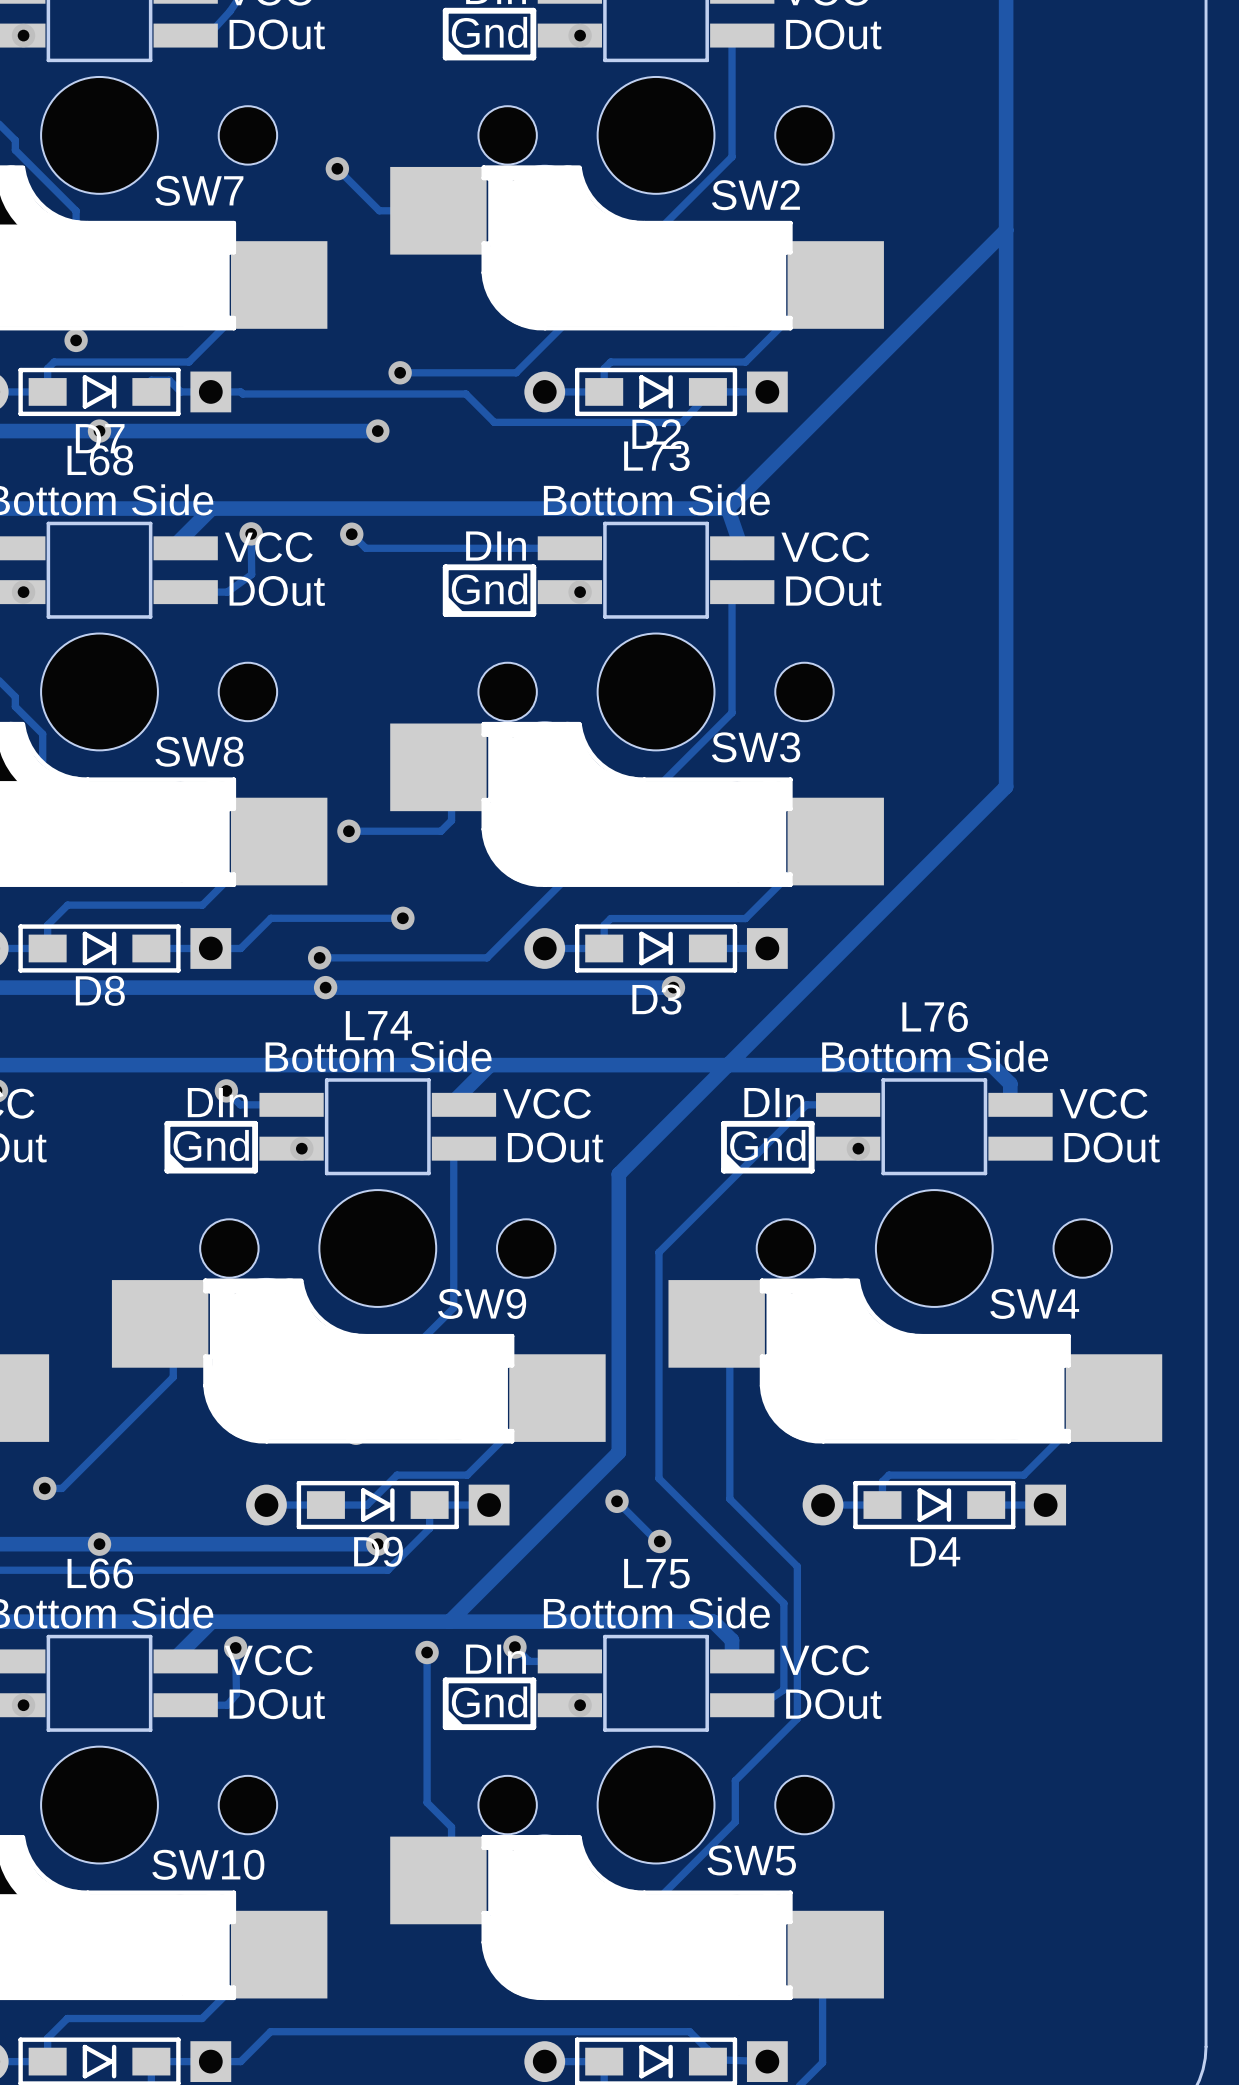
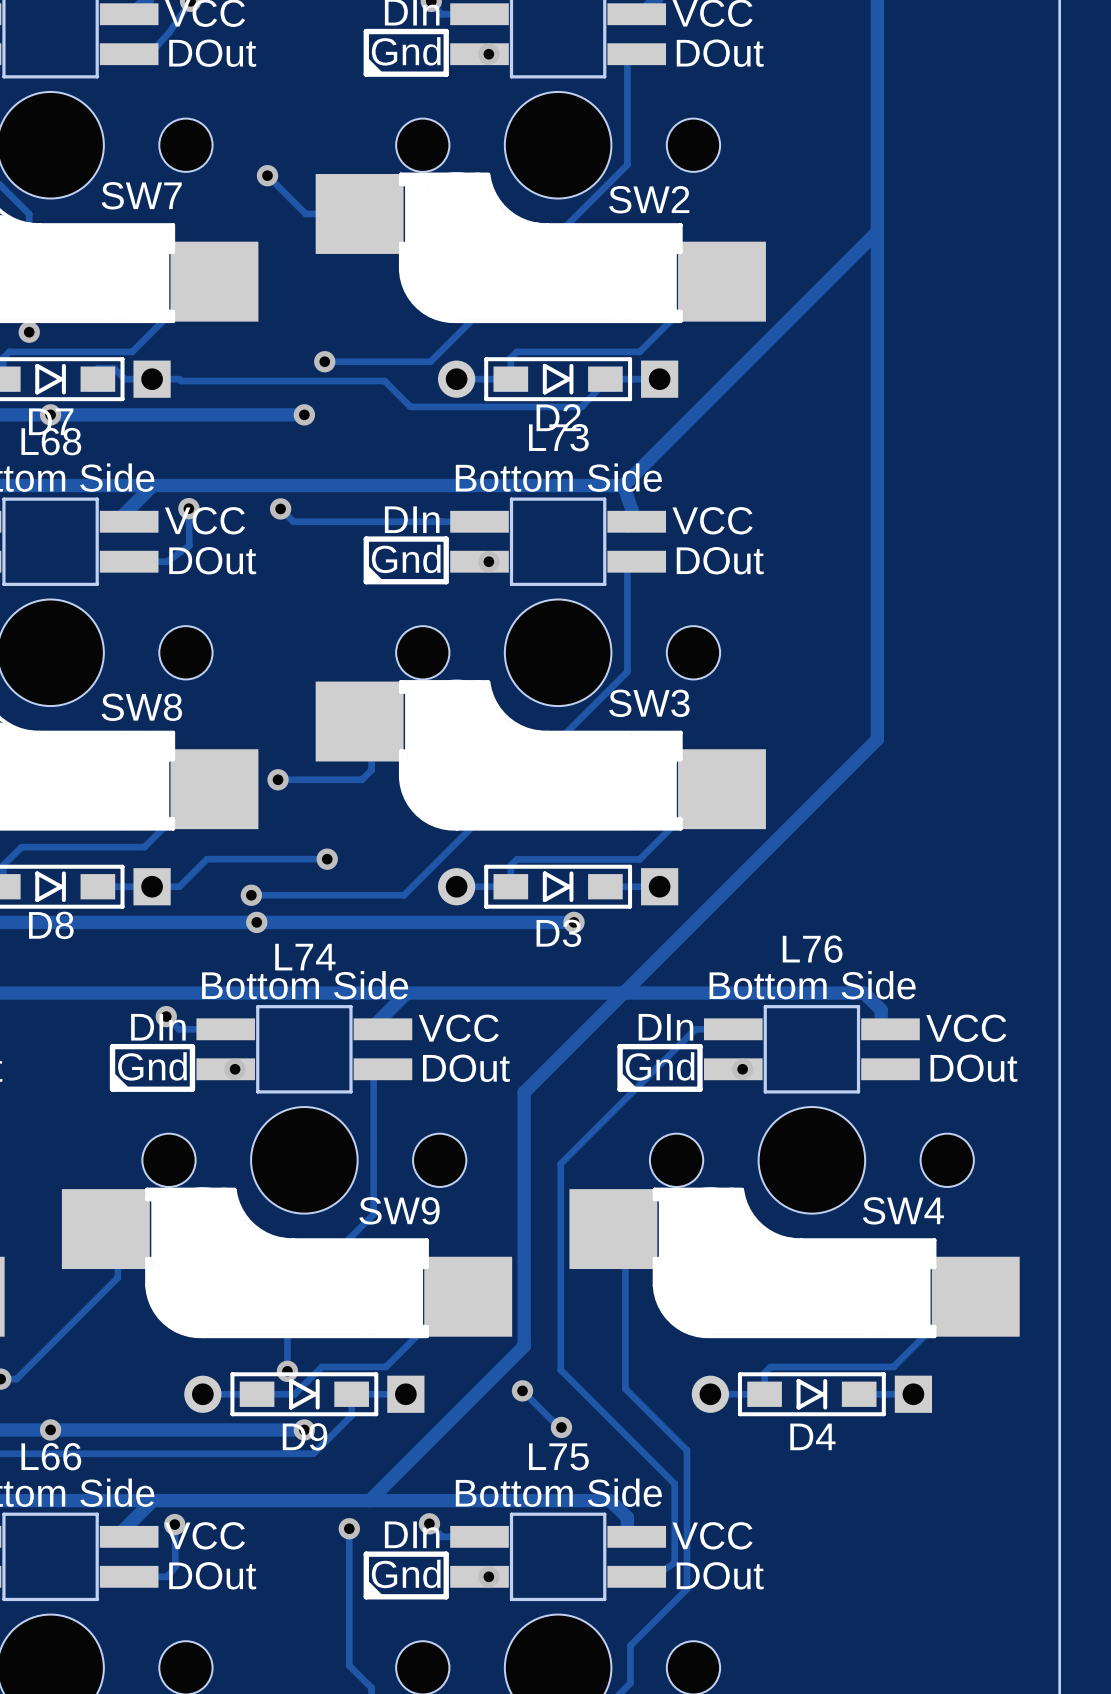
track: (359, 1402) (356, 1433) -> (287, 1300) (287, 1371)
via position: (356, 1433) -> (287, 1371)

